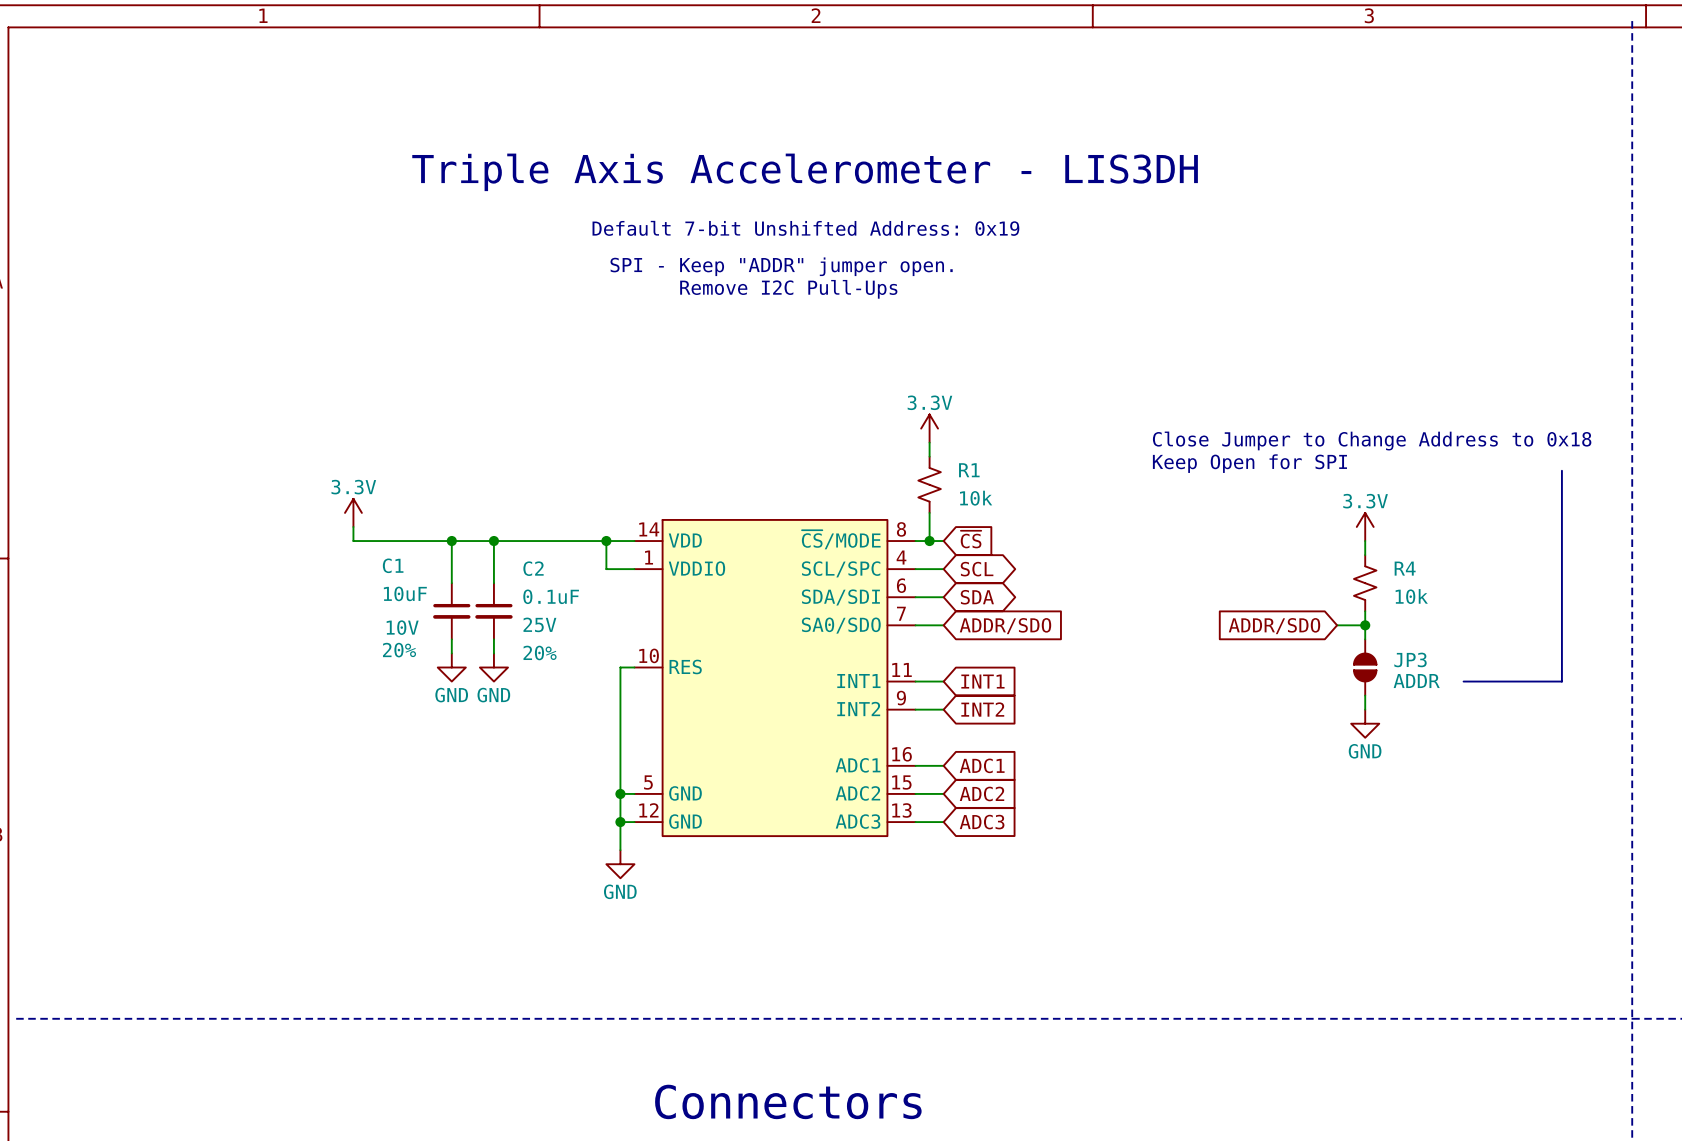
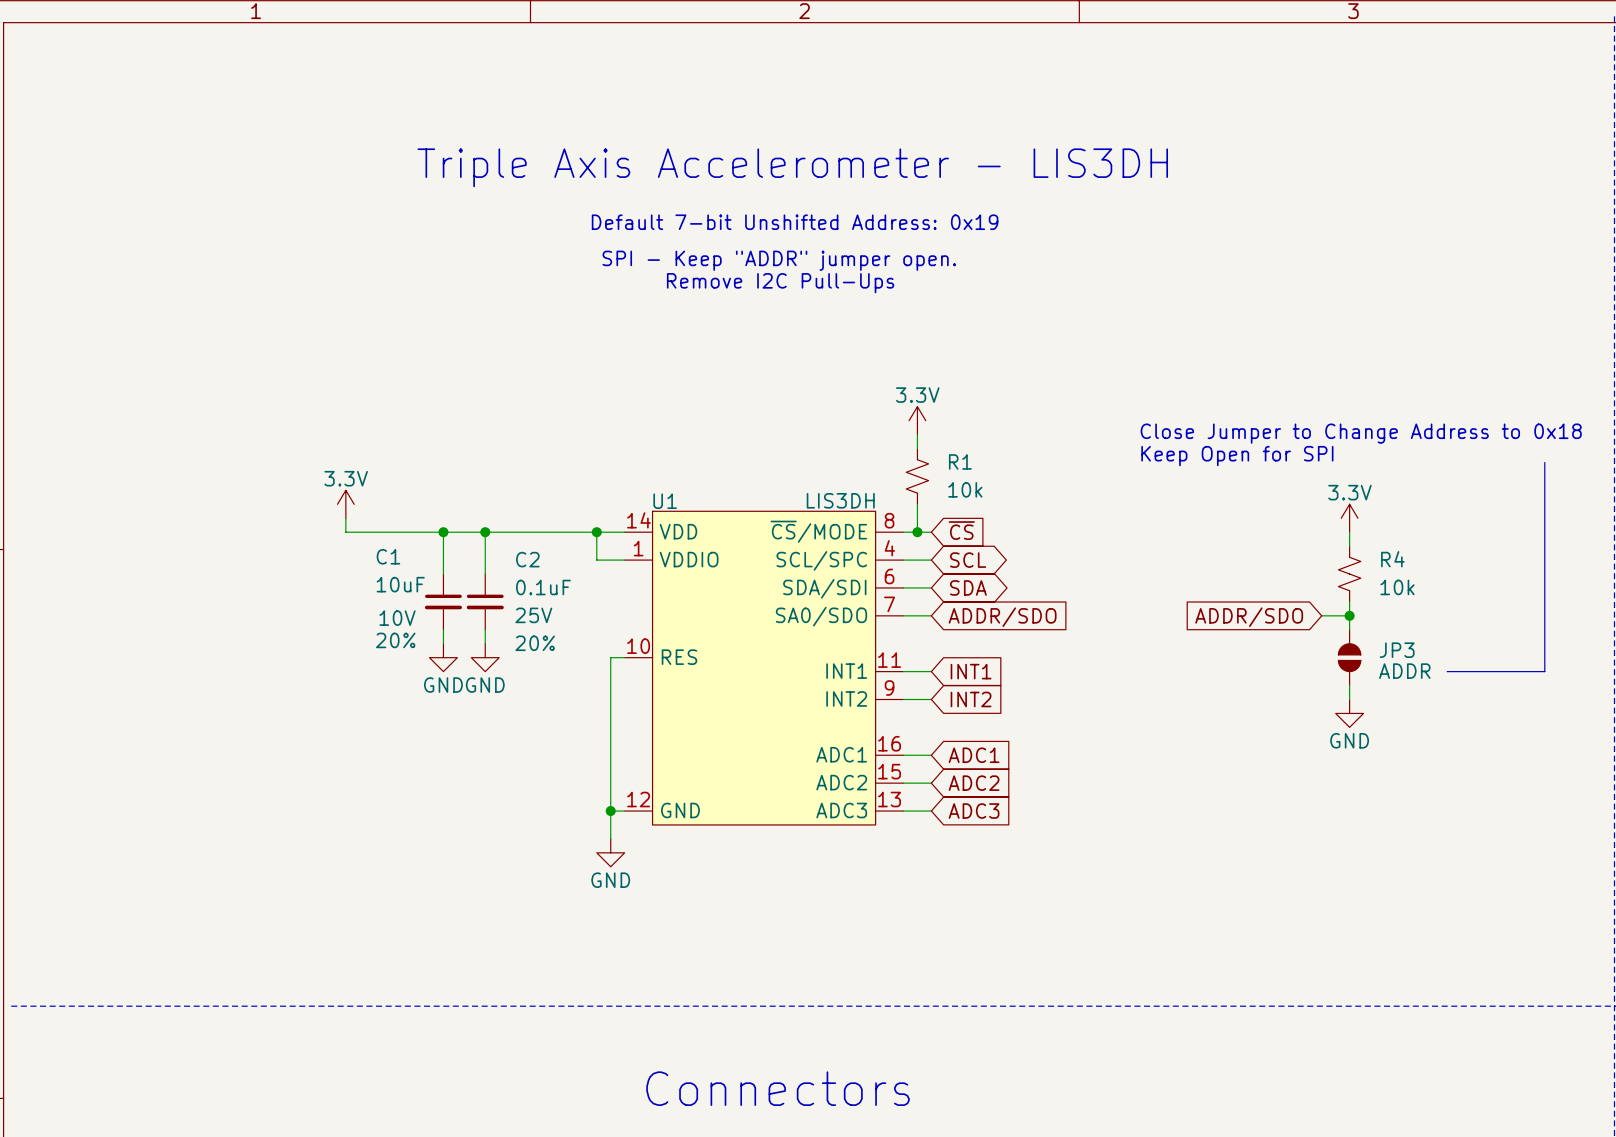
part: (775, 678) -> none
U1: none -> LIS3DH (764, 668)
wire: (620, 793) (634, 793) -> none
junction: (620, 793) -> none

